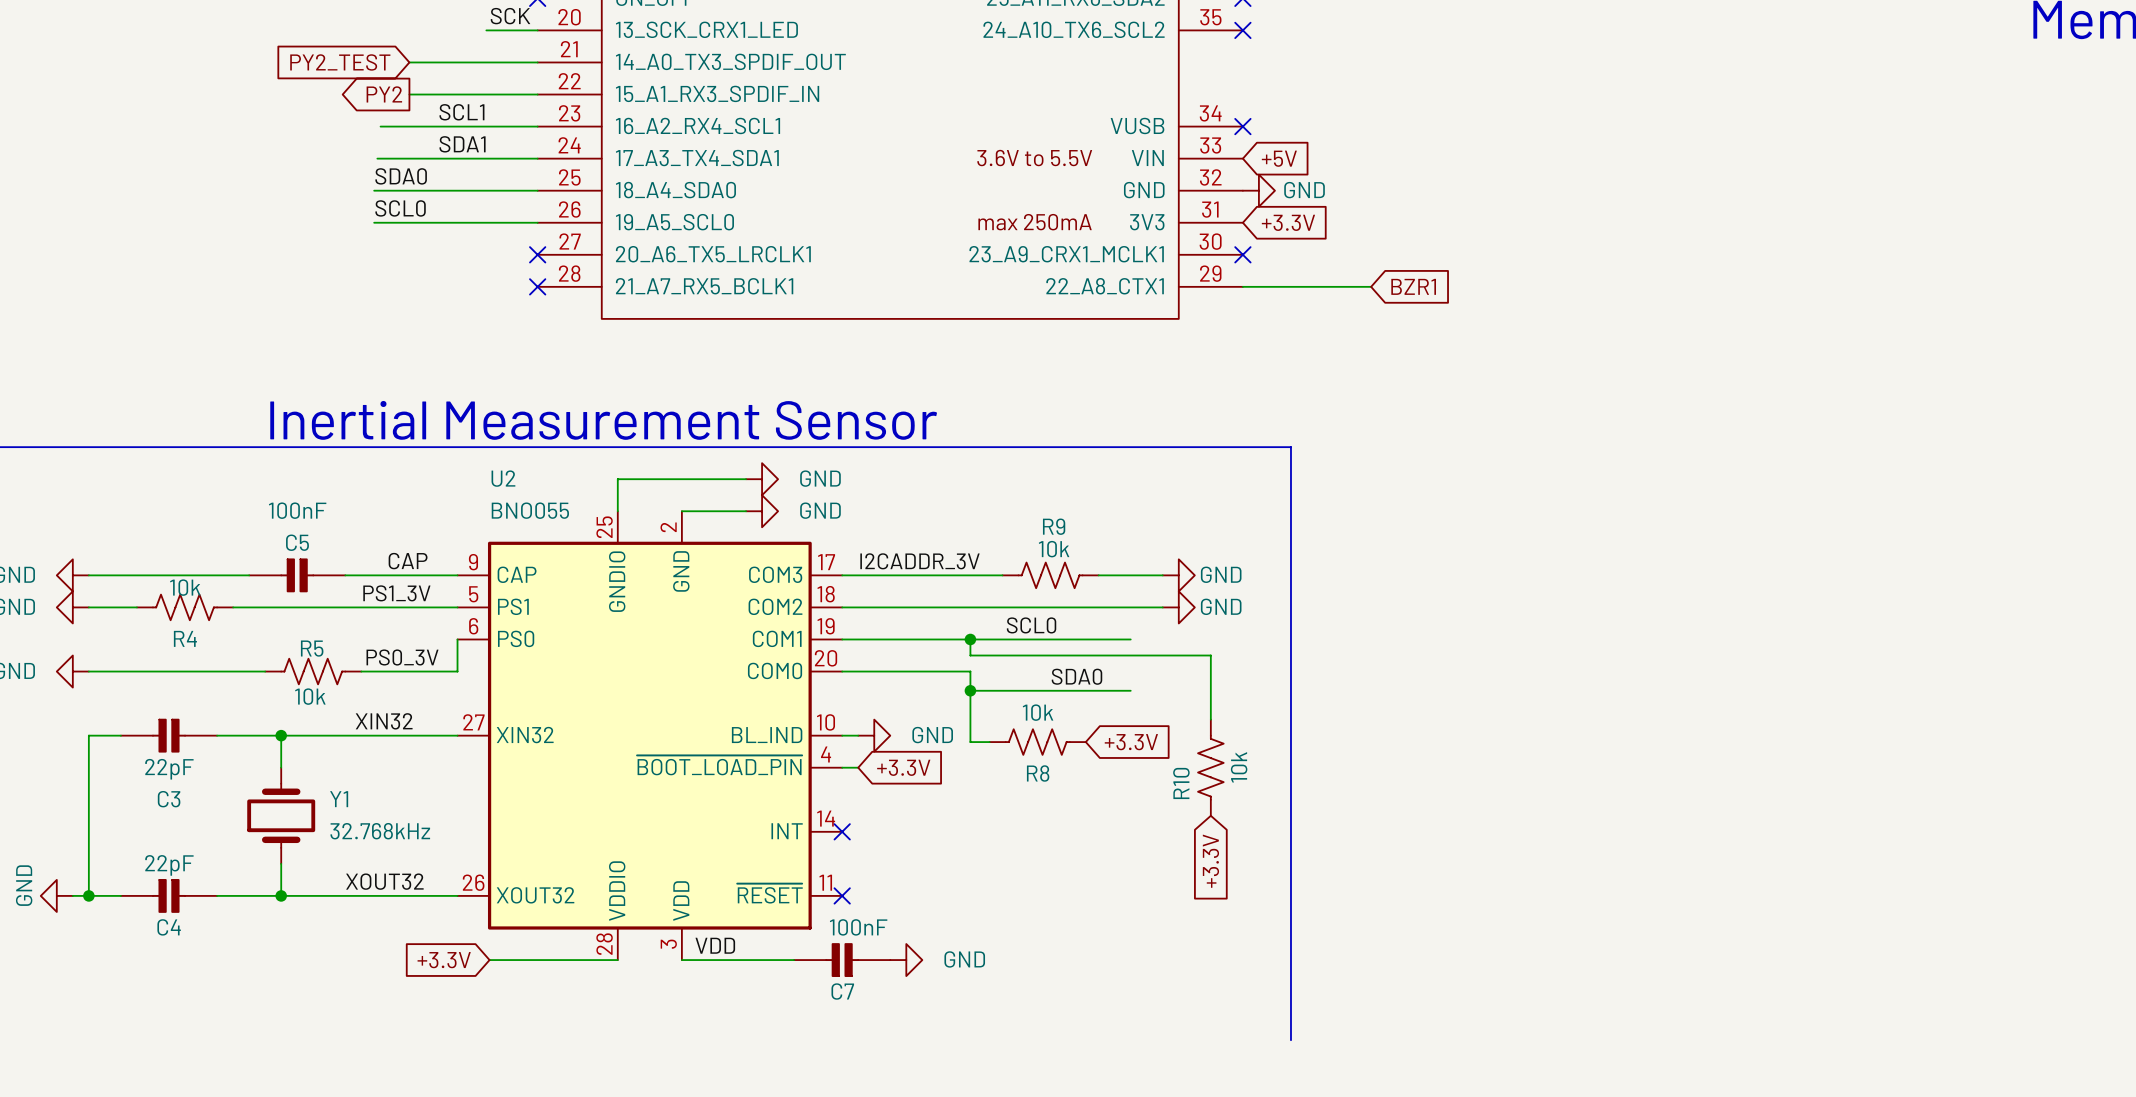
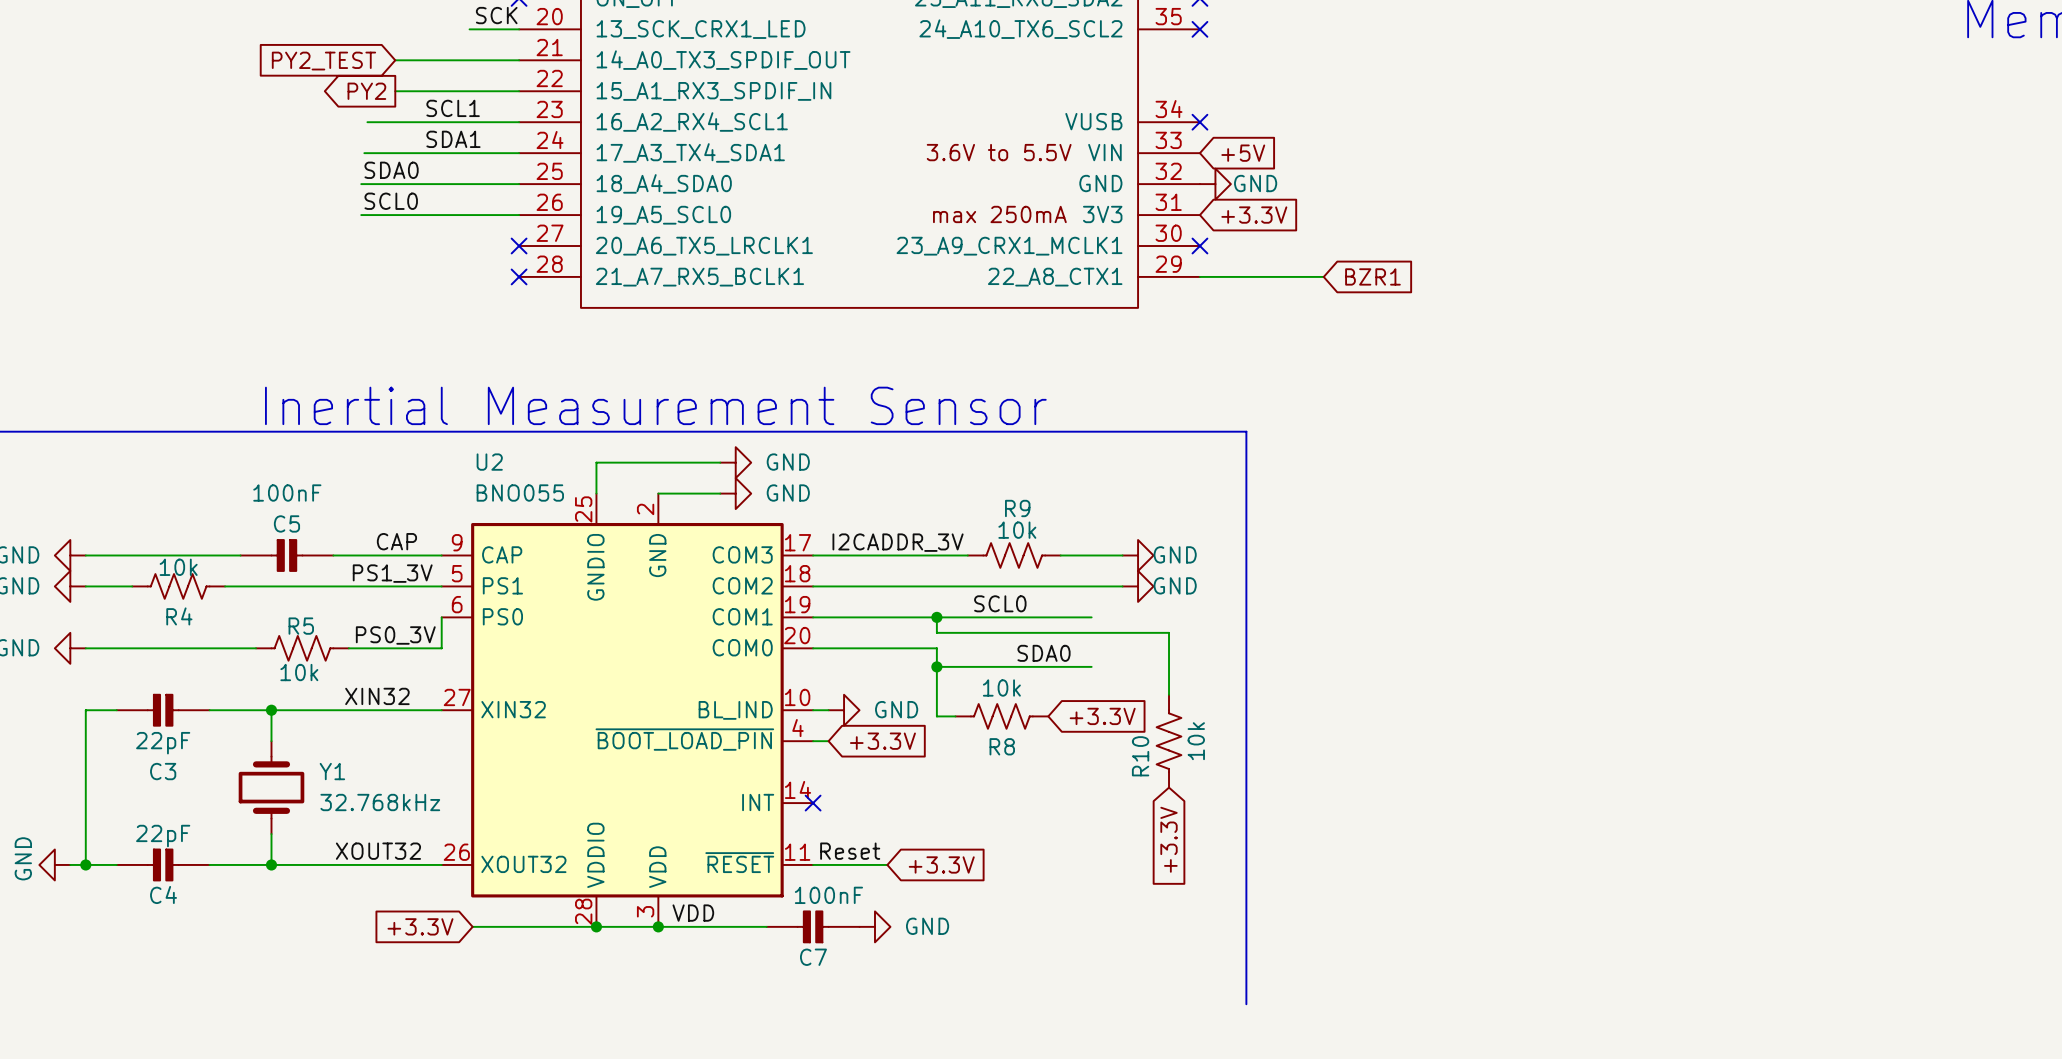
label: none -> Reset (850, 851)
wire: none -> (813, 864) (887, 864)
no-connect mark: (842, 895) -> none
global label: none -> +3.3V (941, 864)
wire: none -> (596, 926) (658, 926)
junction: none -> (596, 926)
junction: none -> (658, 926)

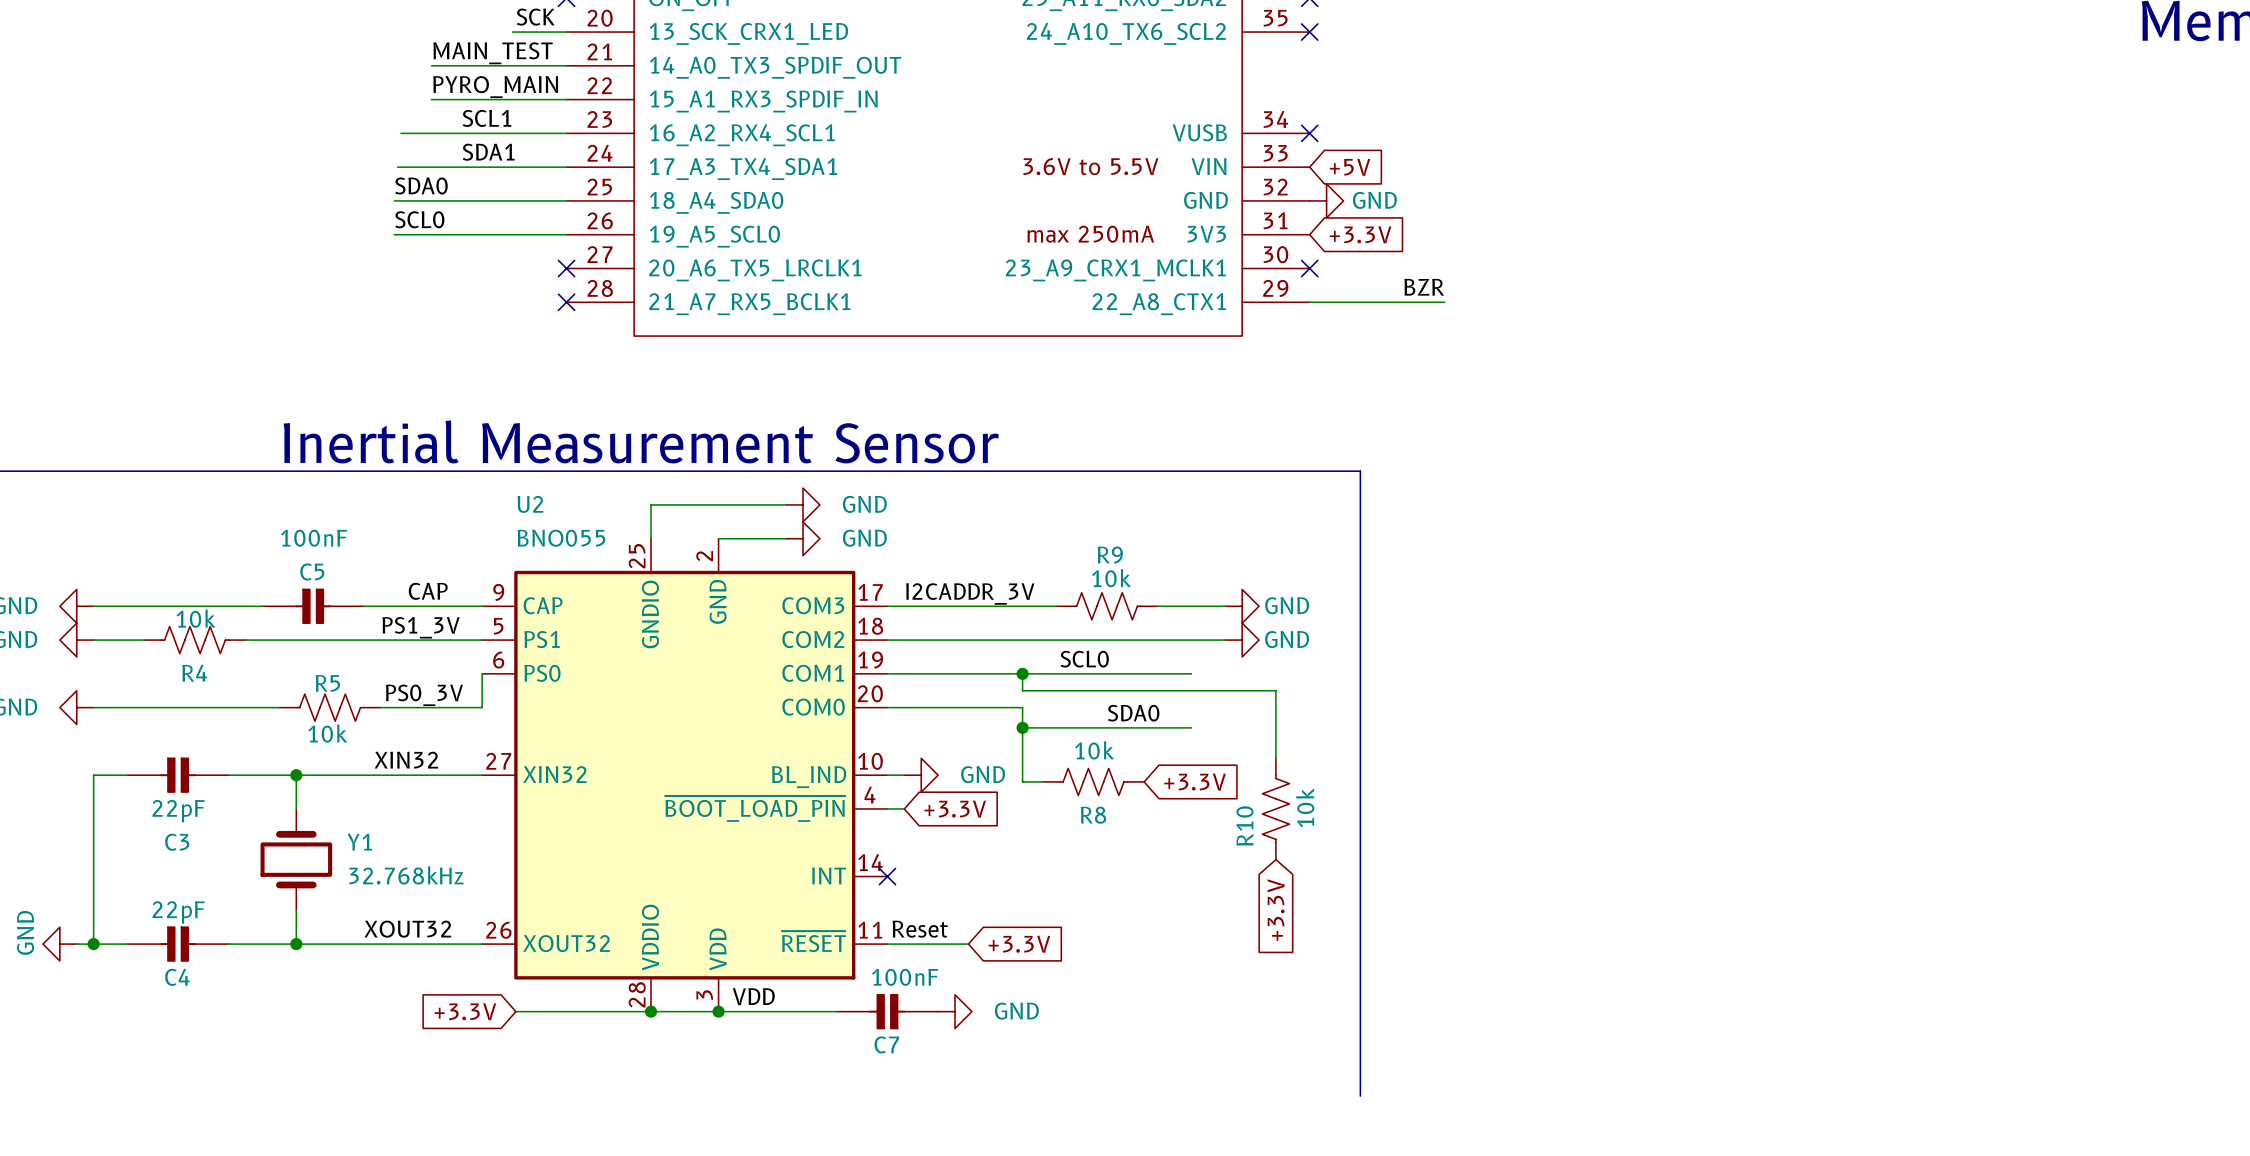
label: none -> MAIN_TEST (493, 53)
global label: PY2_TEST (323, 61) -> none
label: none -> PYRO_MAIN (495, 87)
global label: PY2 (366, 91) -> none
label: none -> BZR (1424, 287)
global label: BZR1 (1372, 276) -> none

